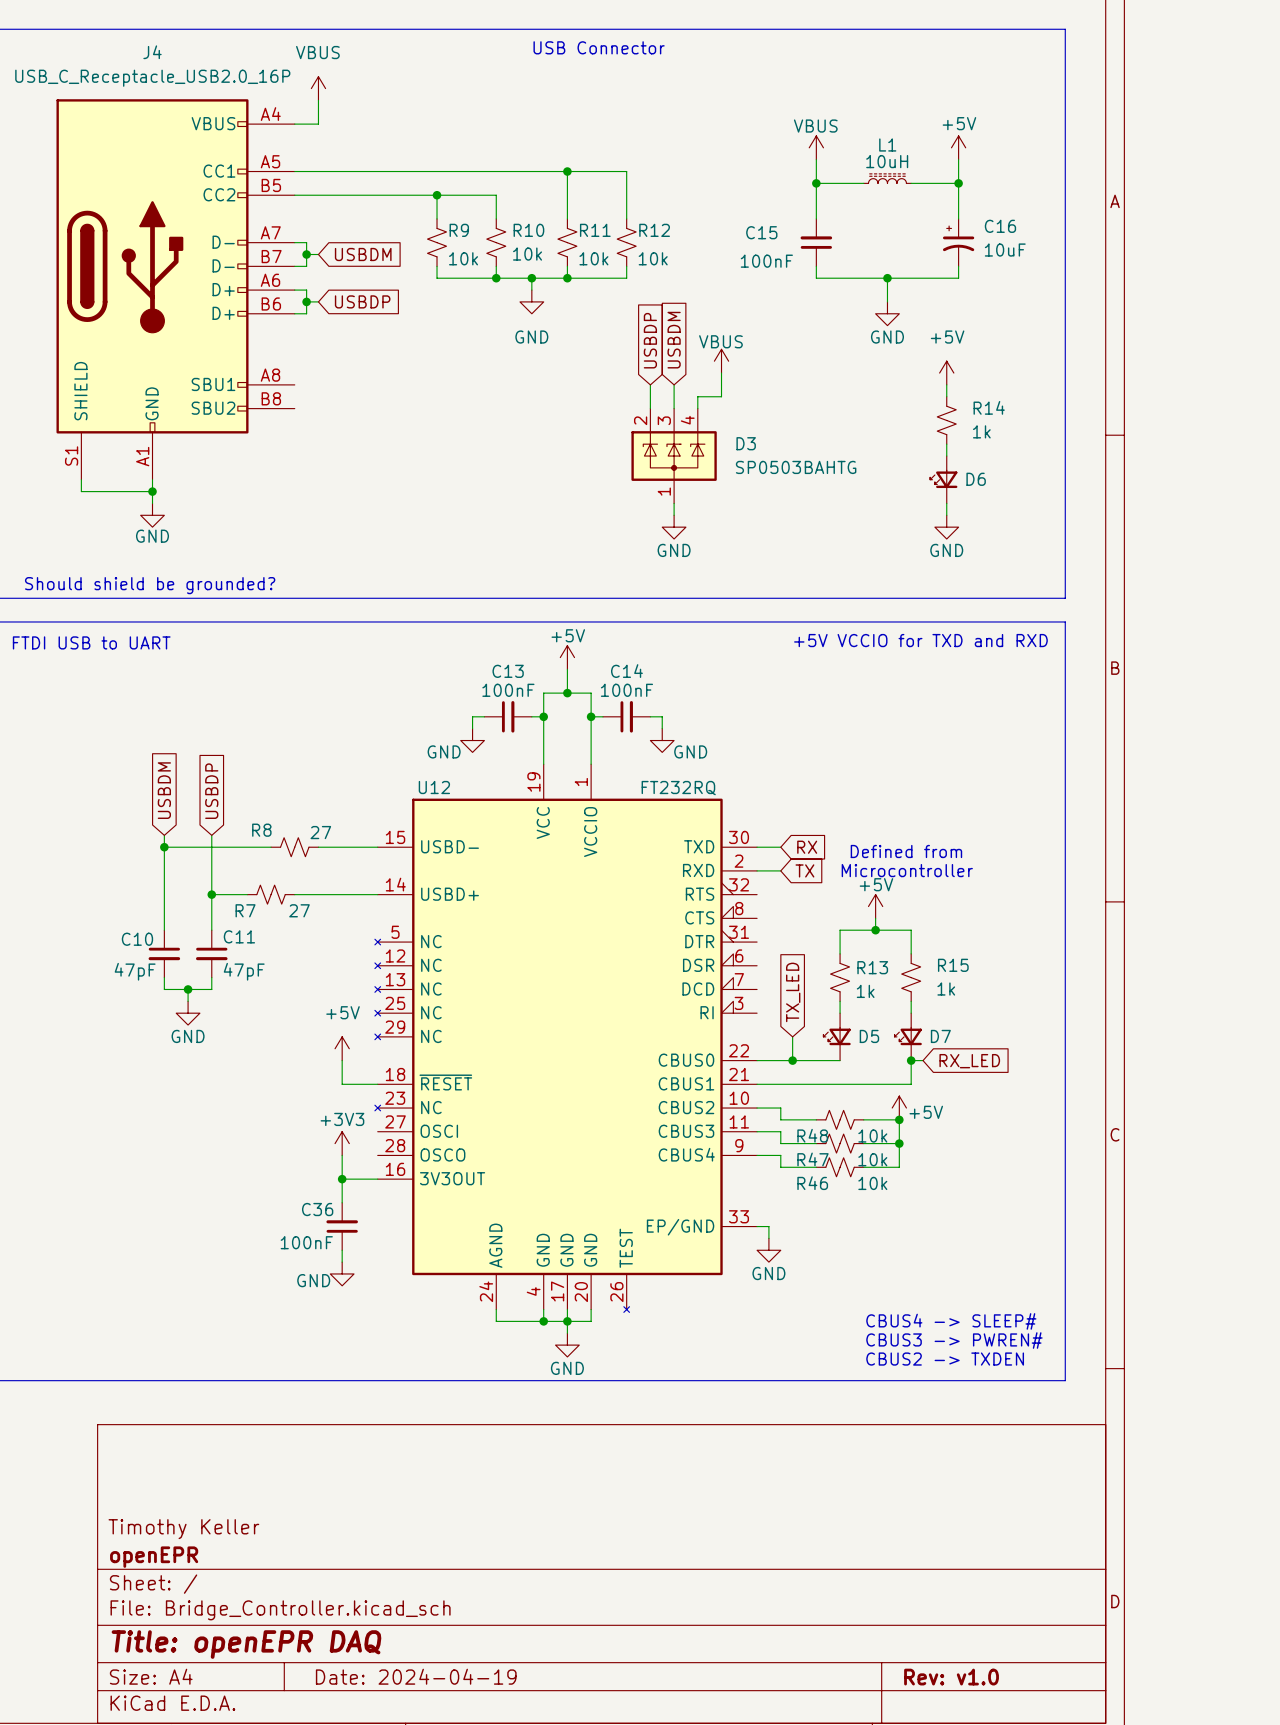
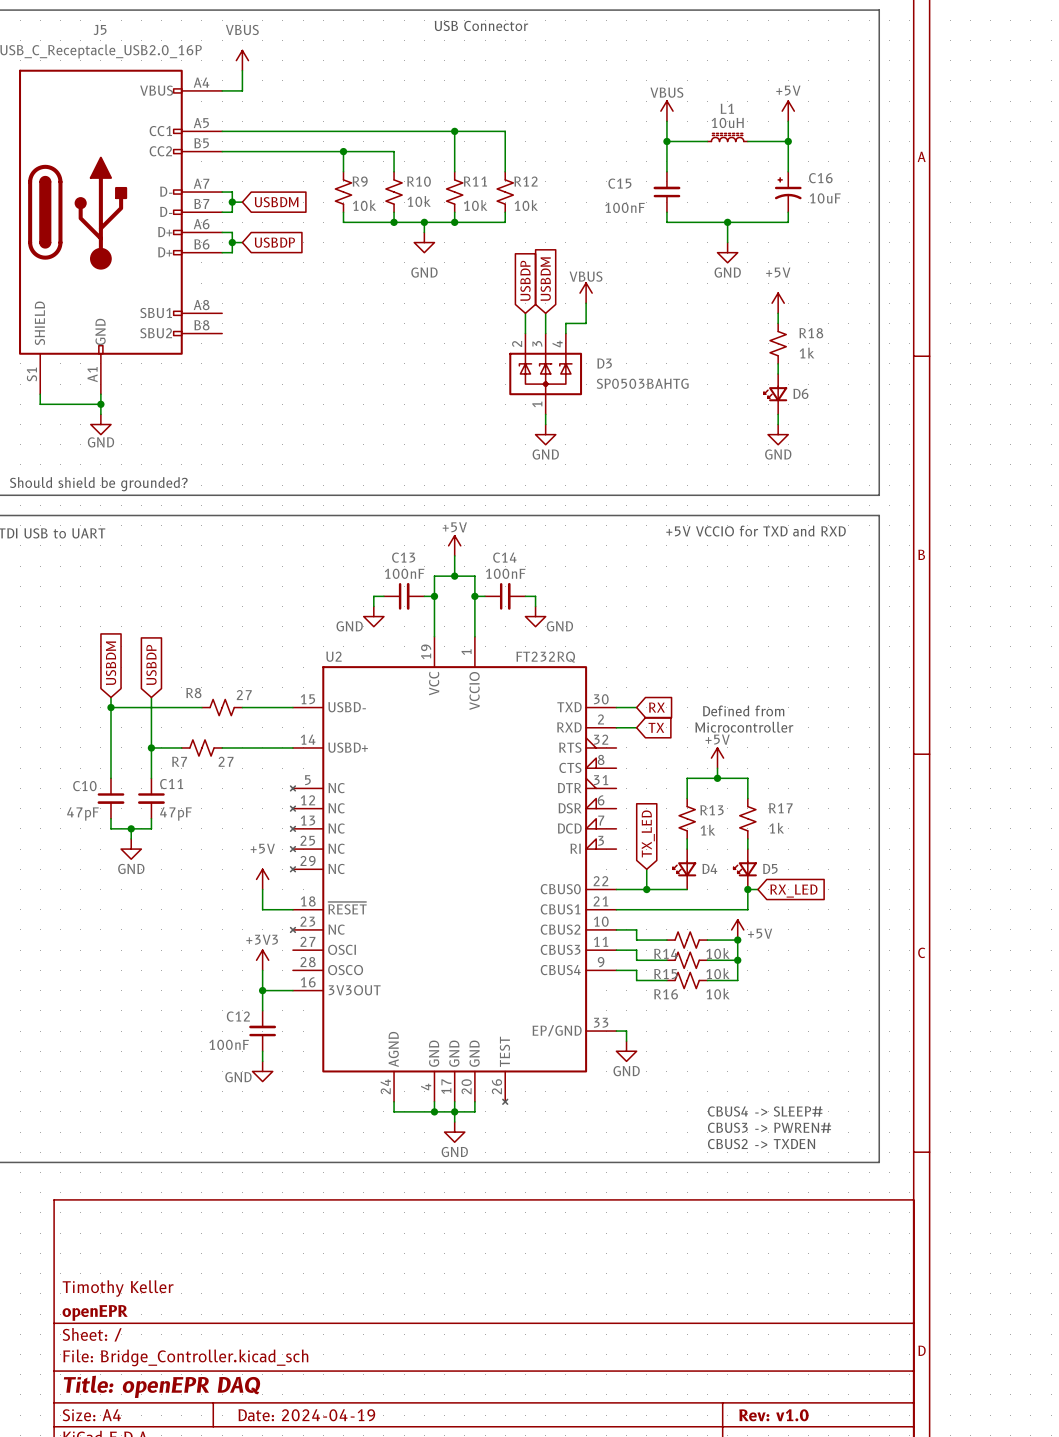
J4 name: J4 (152, 52) -> J5 (100, 29)
R14 name: R14 (989, 407) -> R18 (811, 333)
U12 name: U12 (434, 787) -> U2 (333, 656)
R15 name: R15 (953, 965) -> R17 (780, 808)
D5 name: D5 (869, 1036) -> D4 (709, 868)
D7 name: D7 (940, 1036) -> D5 (770, 868)
R48 name: R48 (812, 1135) -> R14 (665, 953)
R47 name: R47 (812, 1159) -> R15 (665, 974)
R46 name: R46 (812, 1183) -> R16 (666, 994)
C36 name: C36 (317, 1209) -> C12 (238, 1016)

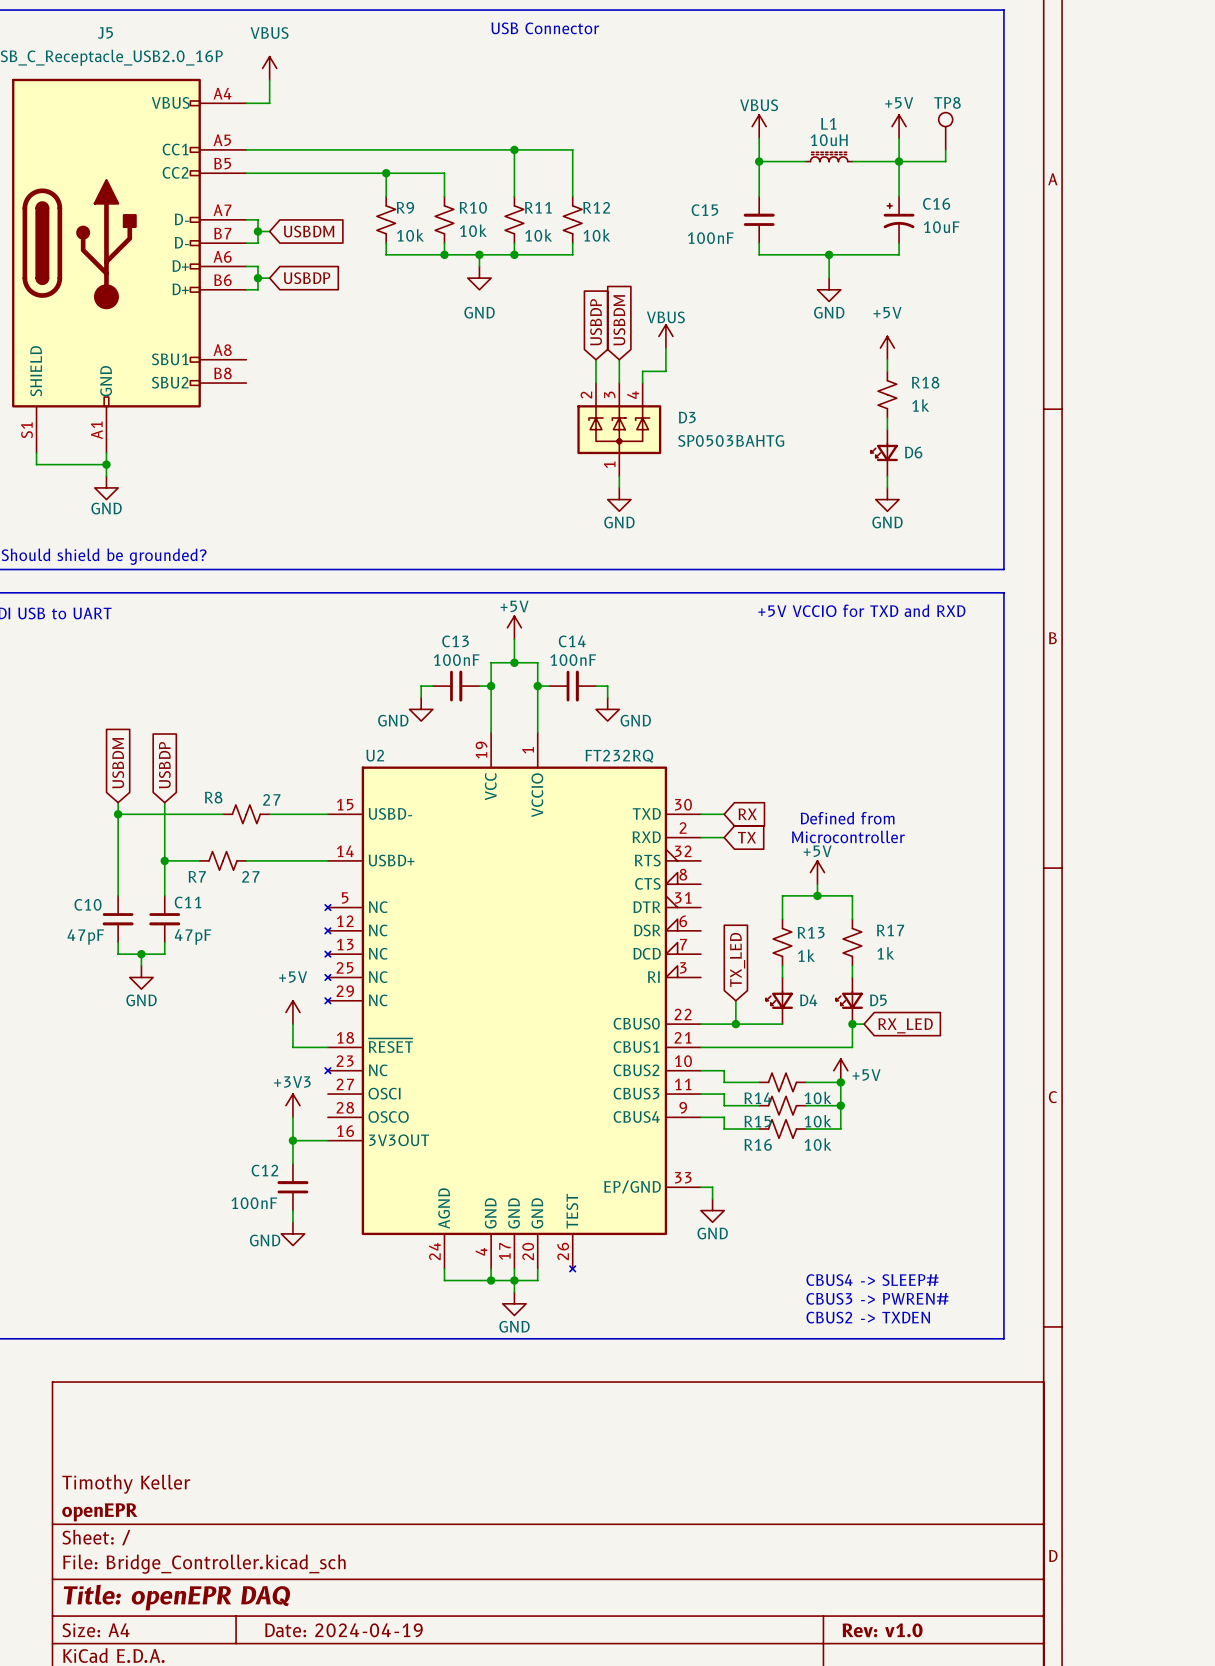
TP8: none -> (945, 131)
wire: none -> (945, 149) (945, 161) (899, 161)

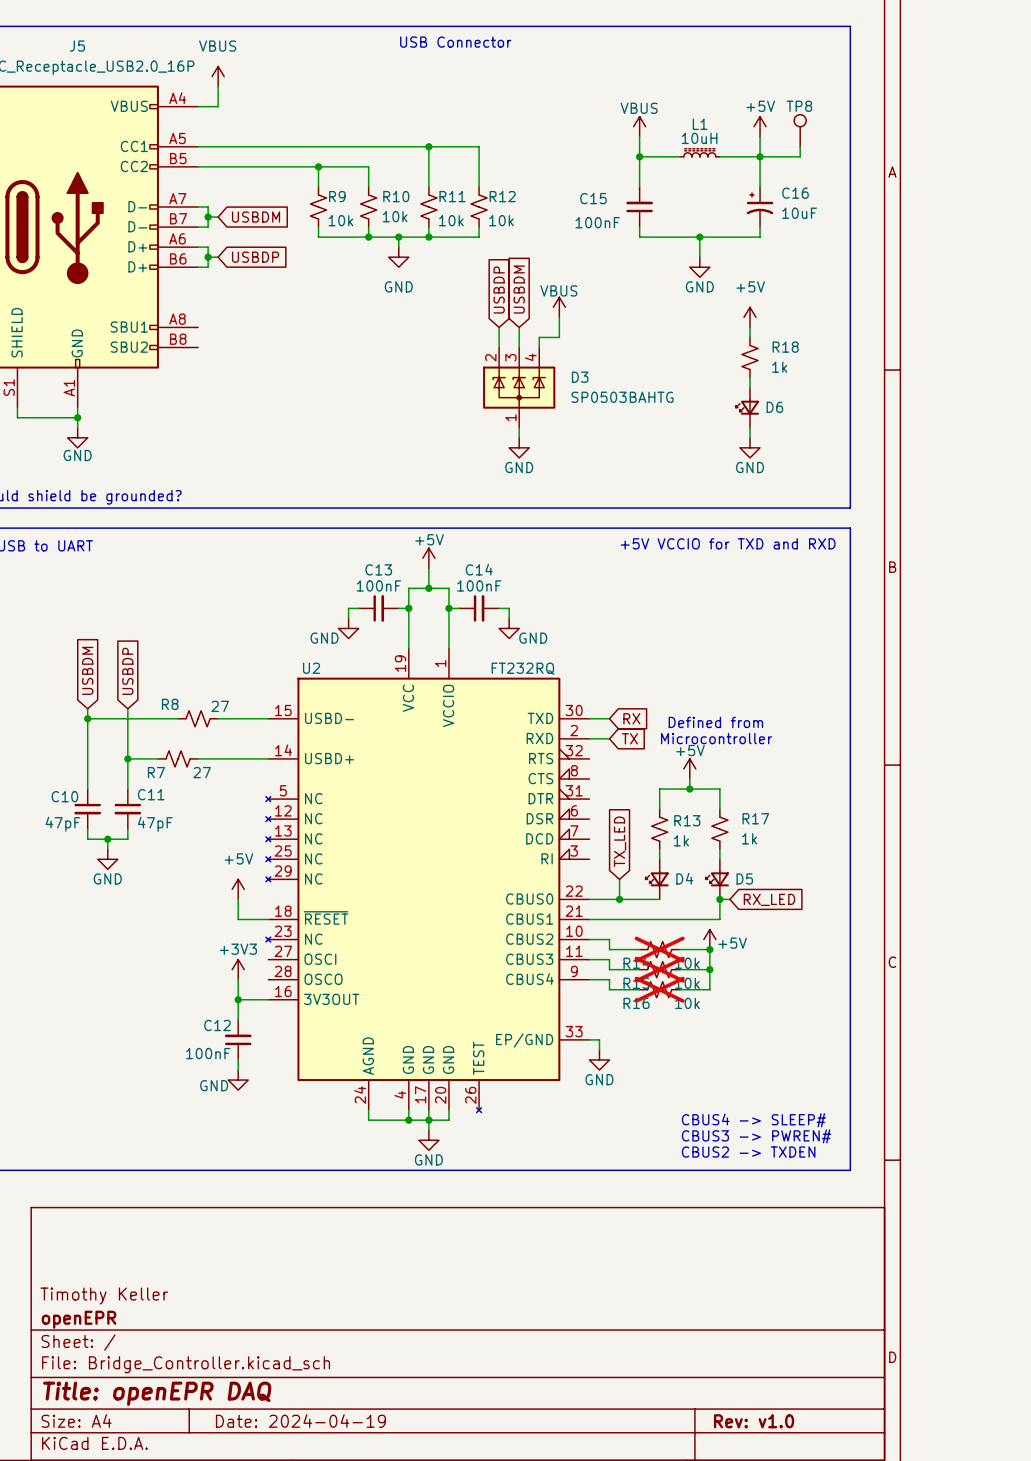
R14 do-not-place cross: none -> (659, 949)
R15 do-not-place cross: none -> (659, 969)
R16 do-not-place cross: none -> (659, 989)

